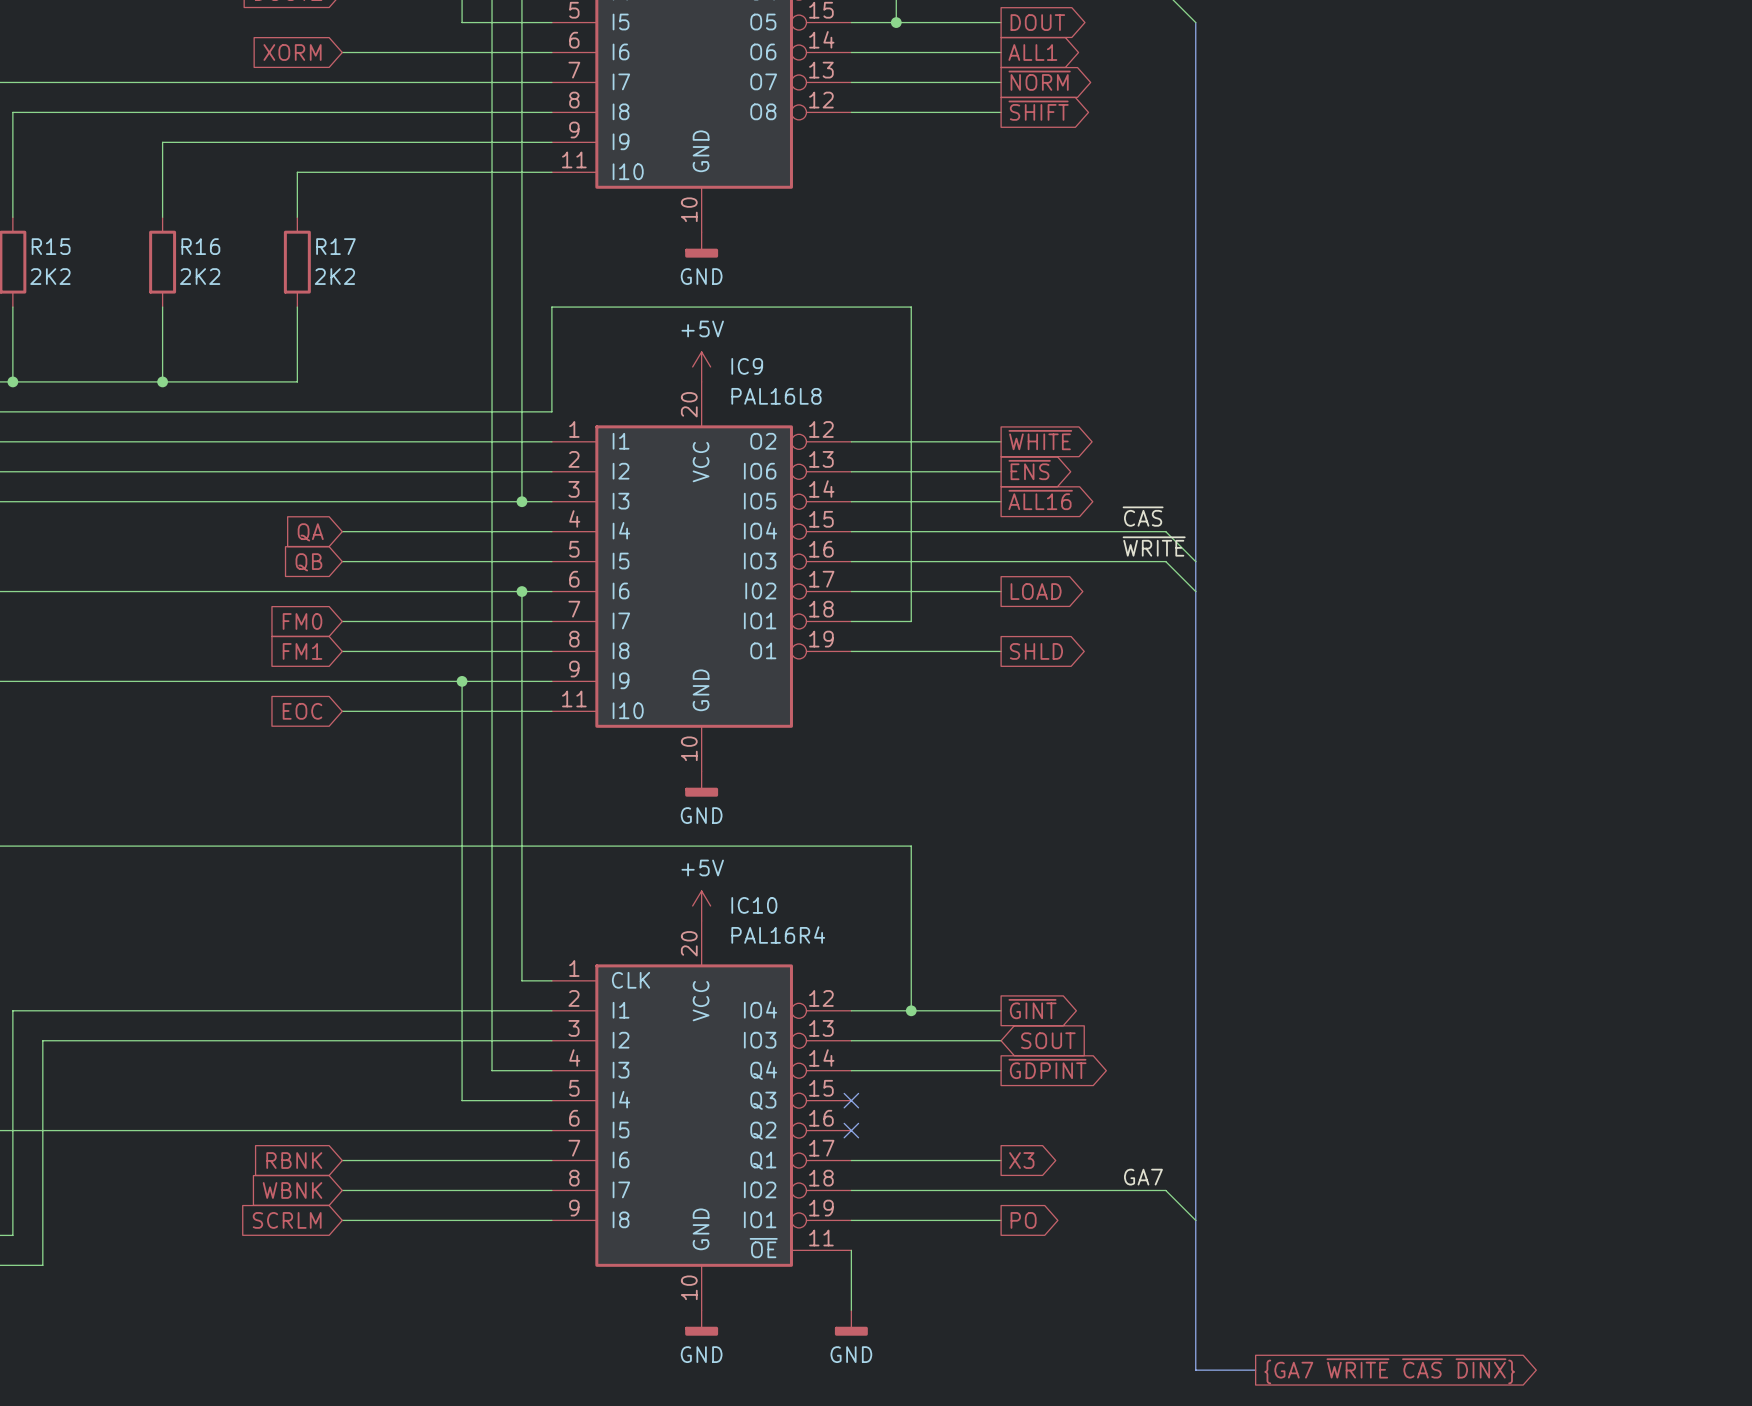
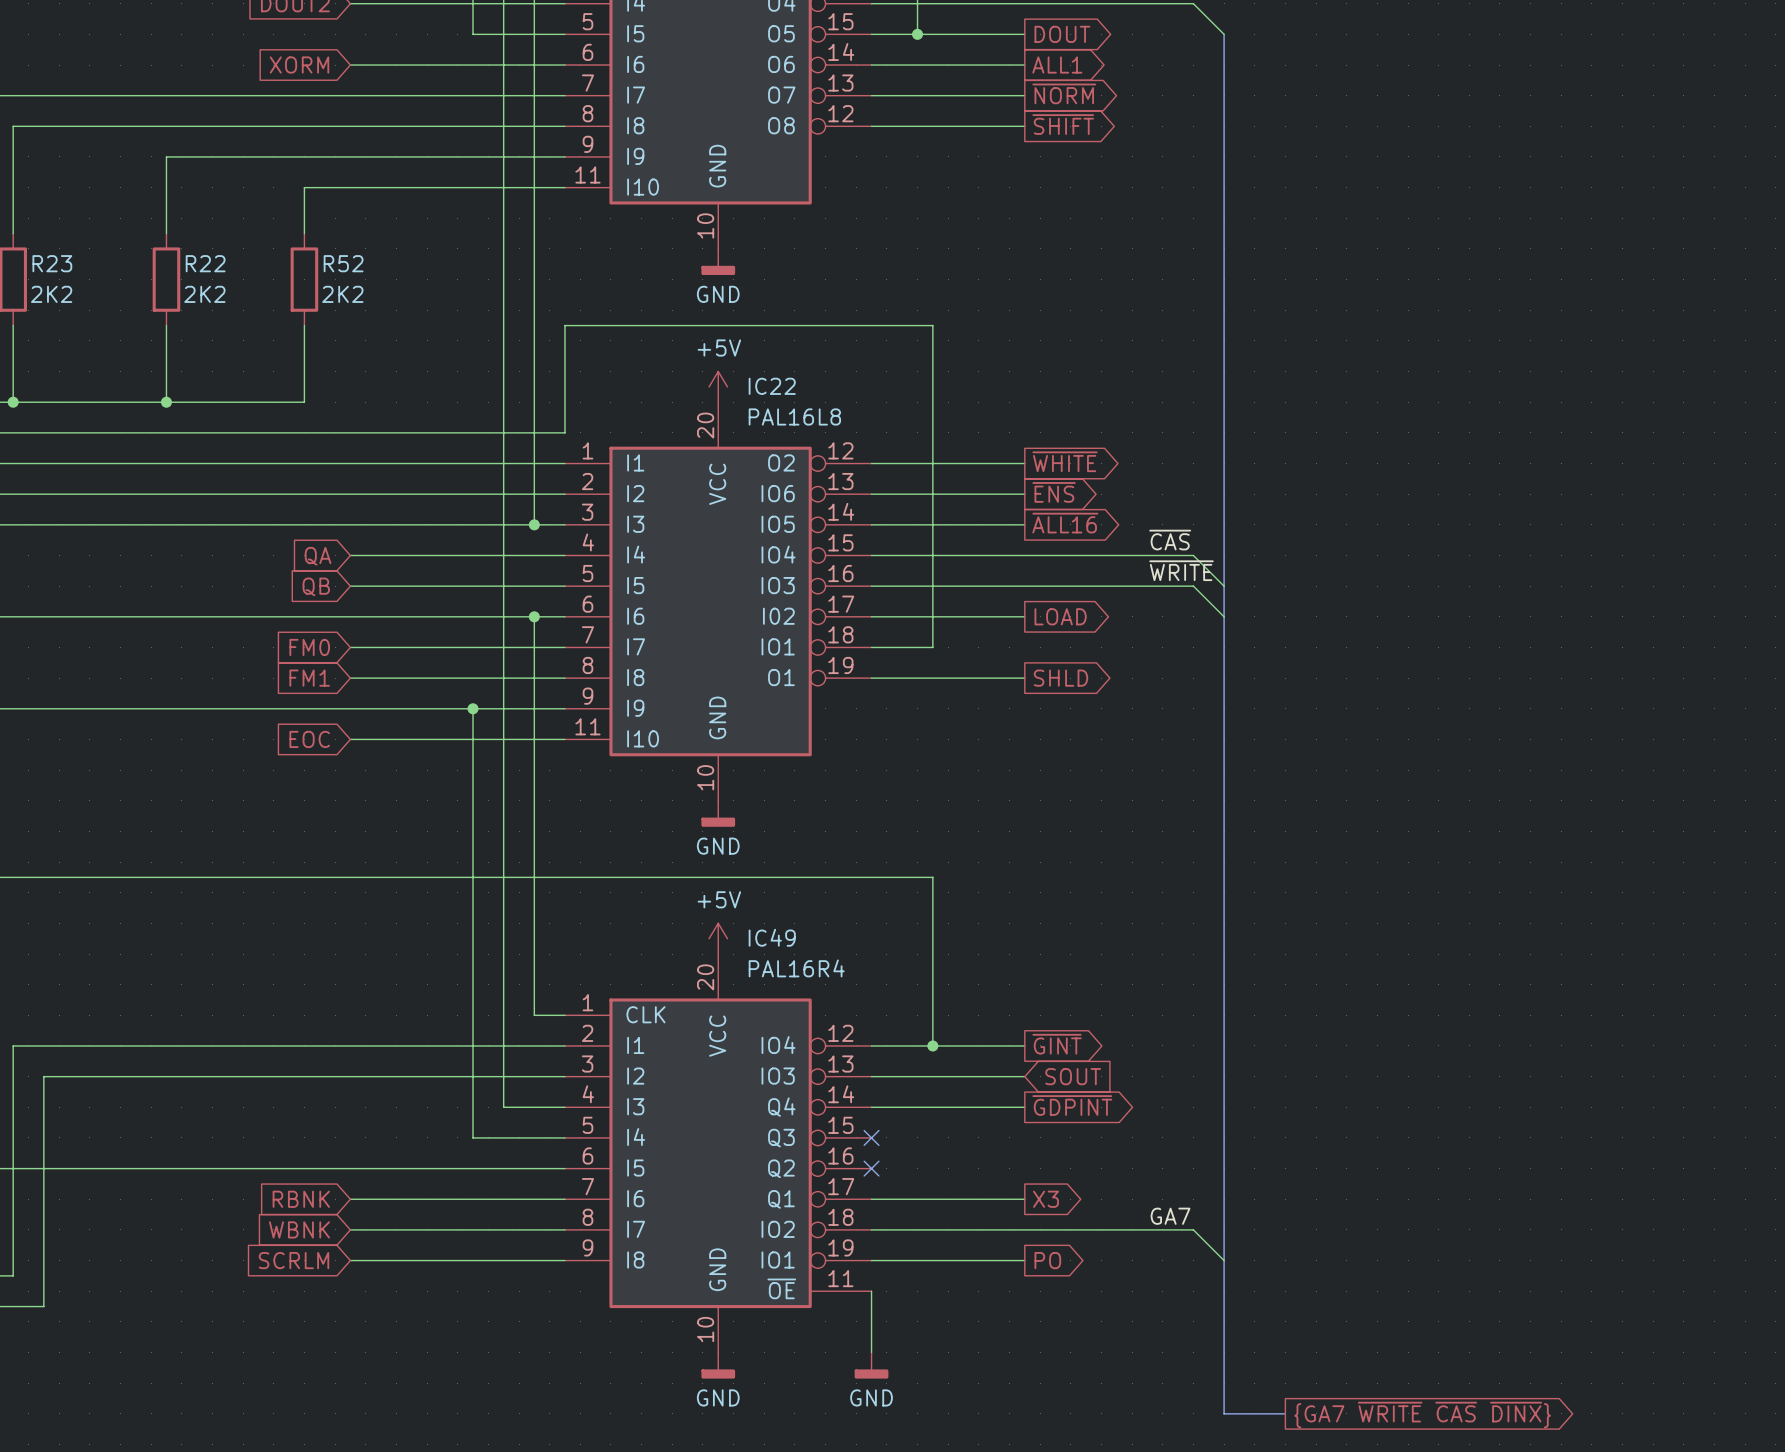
R15 name: R15 (51, 246) -> R23 (52, 263)
R16 name: R16 (200, 246) -> R22 (205, 263)
R17 name: R17 (335, 246) -> R52 (343, 263)
IC9 name: IC9 (747, 366) -> IC22 (772, 386)
IC10 name: IC10 (754, 905) -> IC49 (772, 937)

